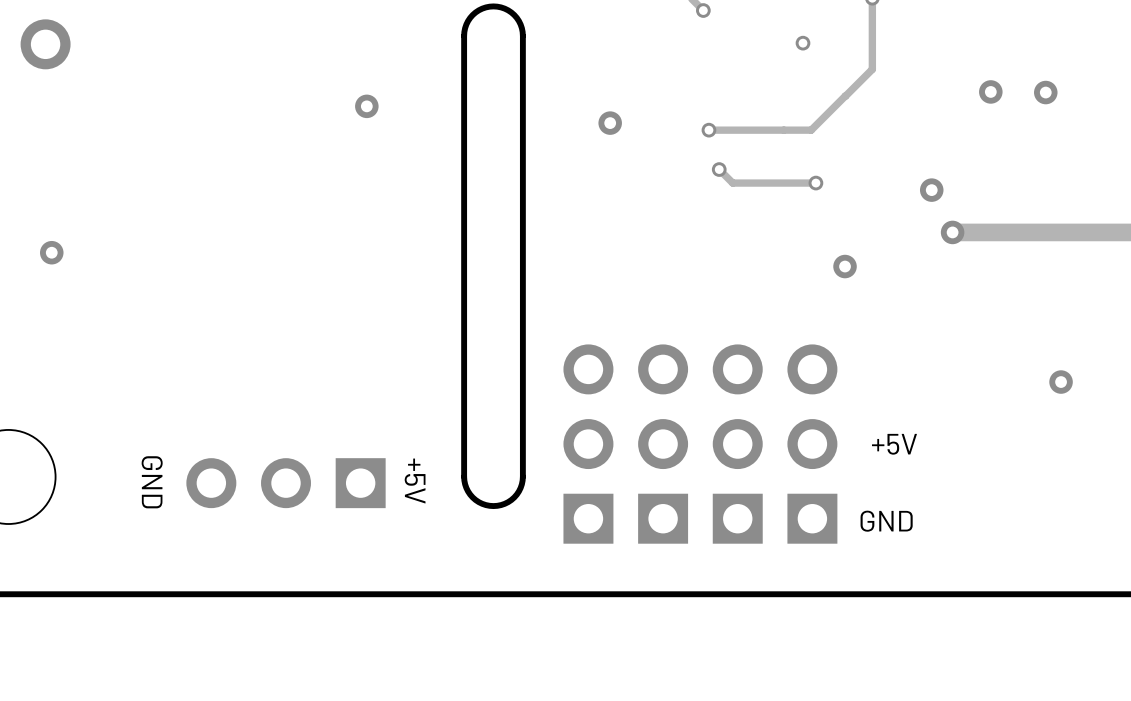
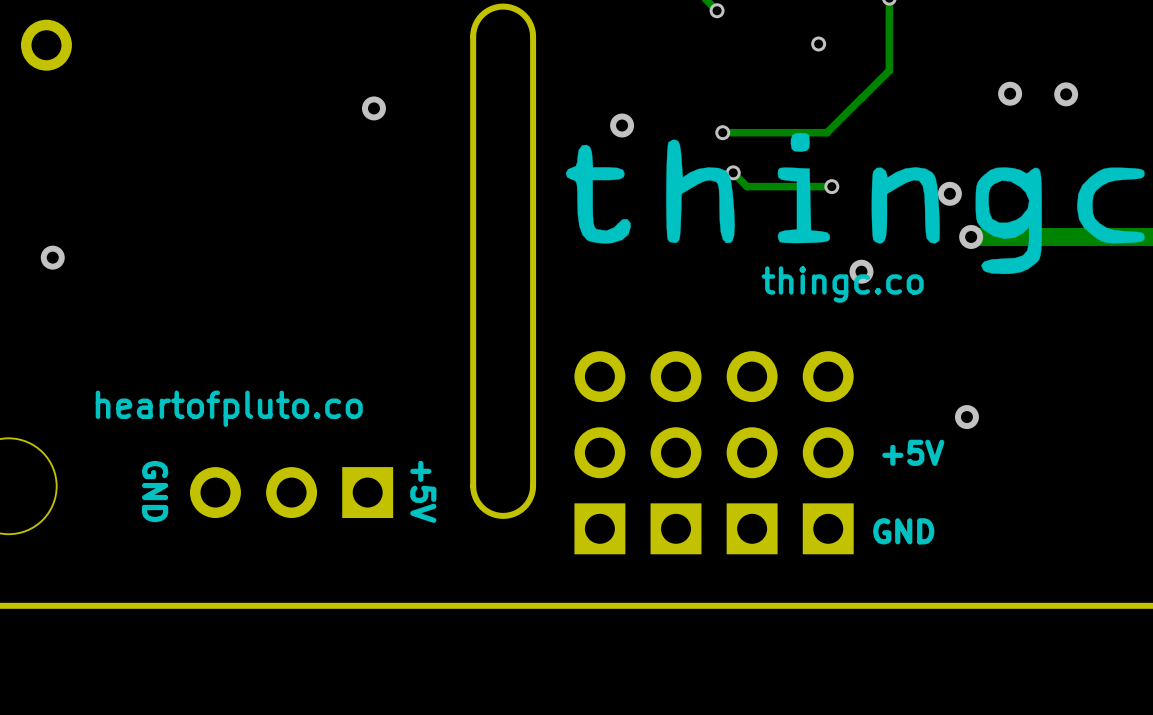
drawing: none -> [565, 132, 1145, 275]
text: none -> thingc.co (842, 284)
via position: (1061, 382) -> (966, 417)
text: none -> heartofpluto.co (229, 408)

